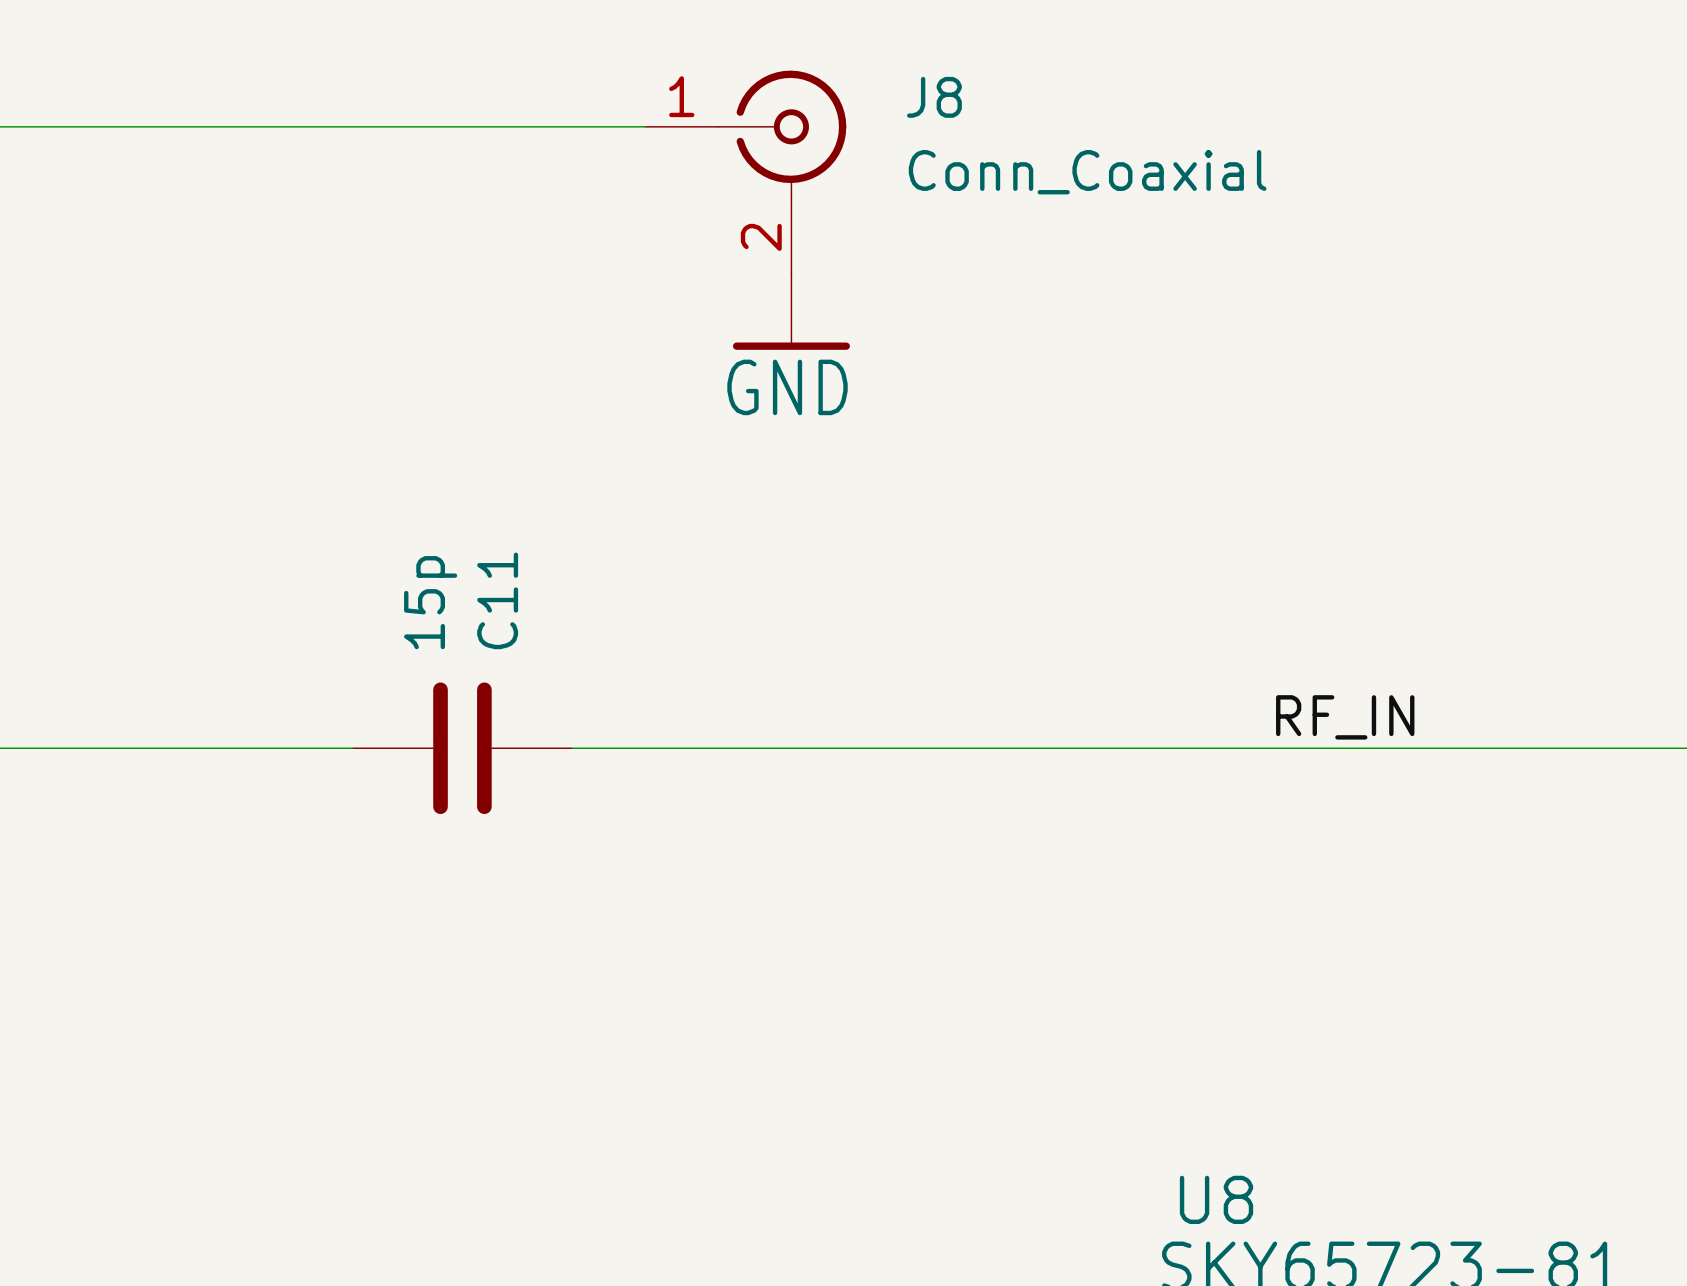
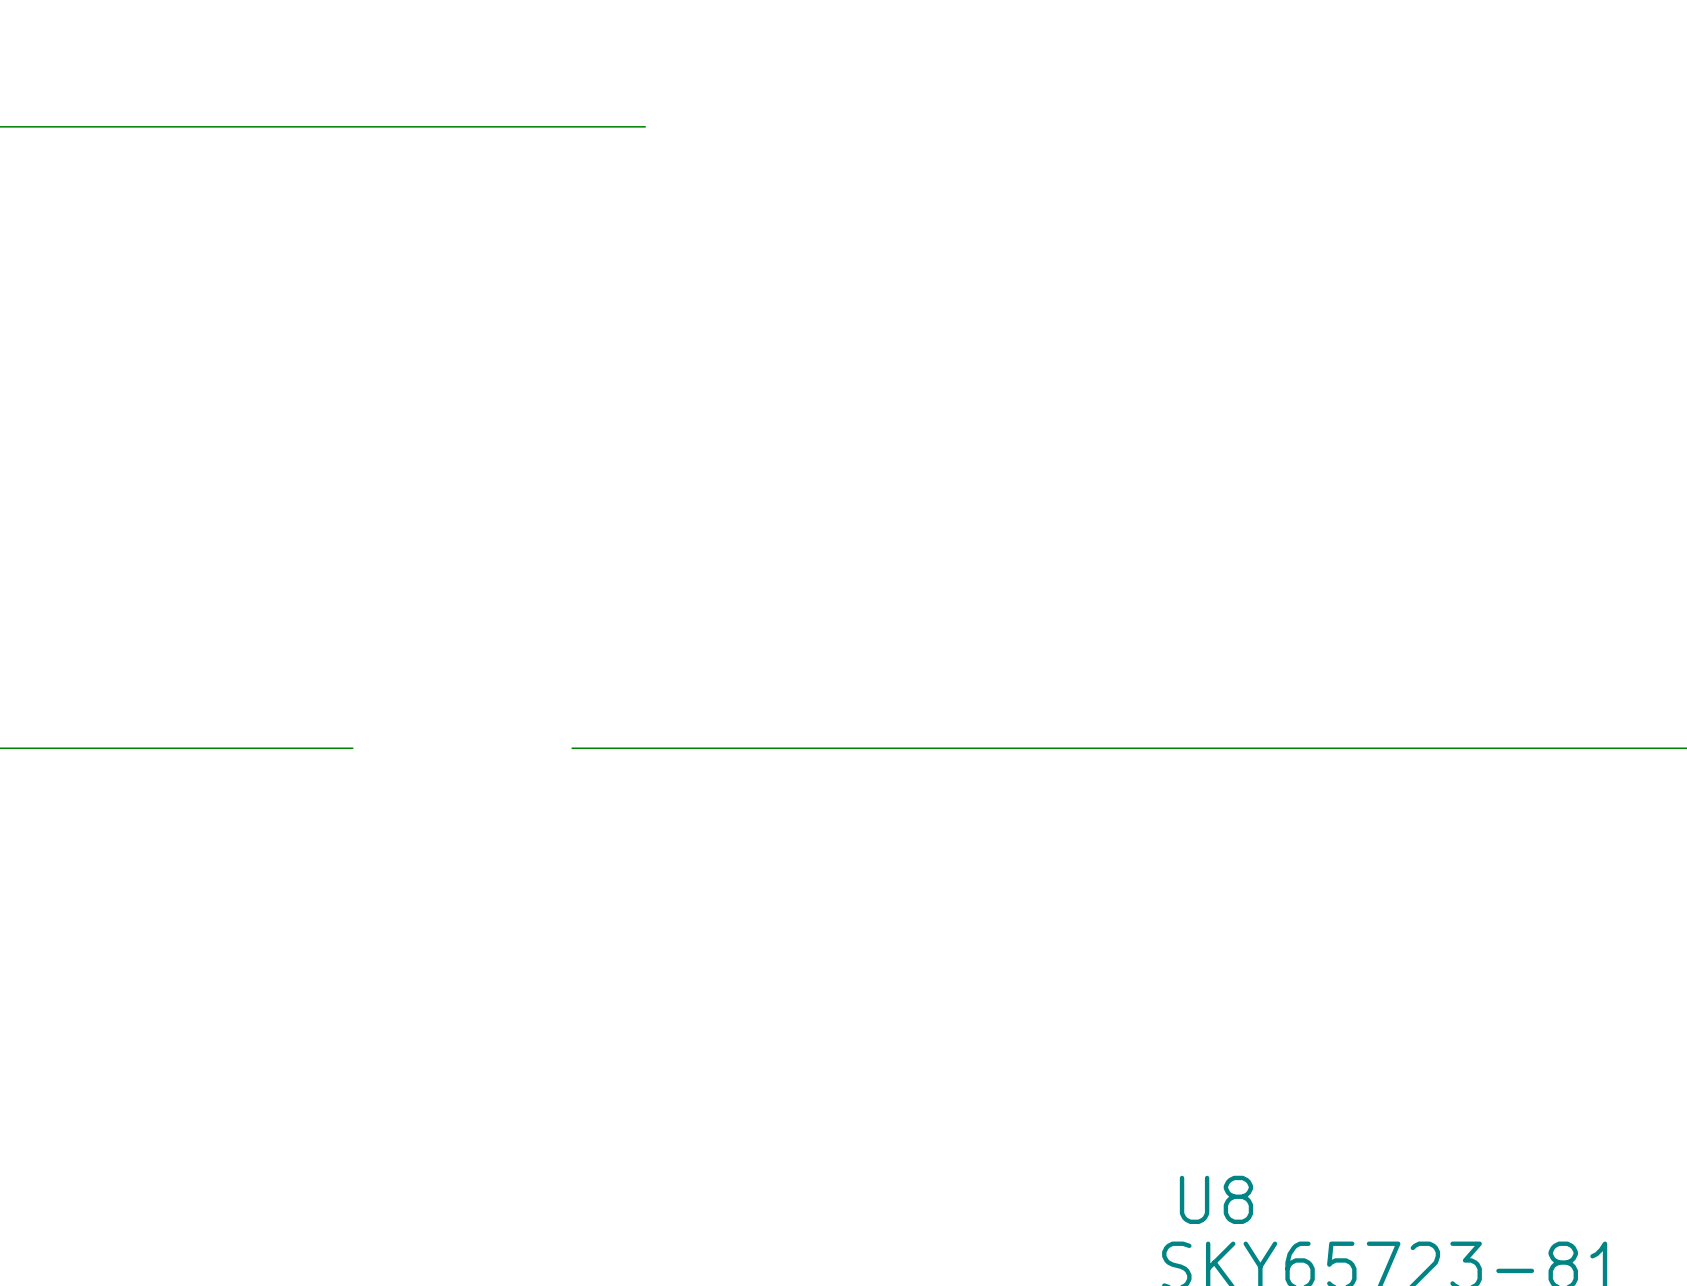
J8: Conn_Coaxial (745, 171) -> none
power symbol: GND (791, 311) -> none
label: RF_IN (1345, 717) -> none
C11: 15p (462, 748) -> none

